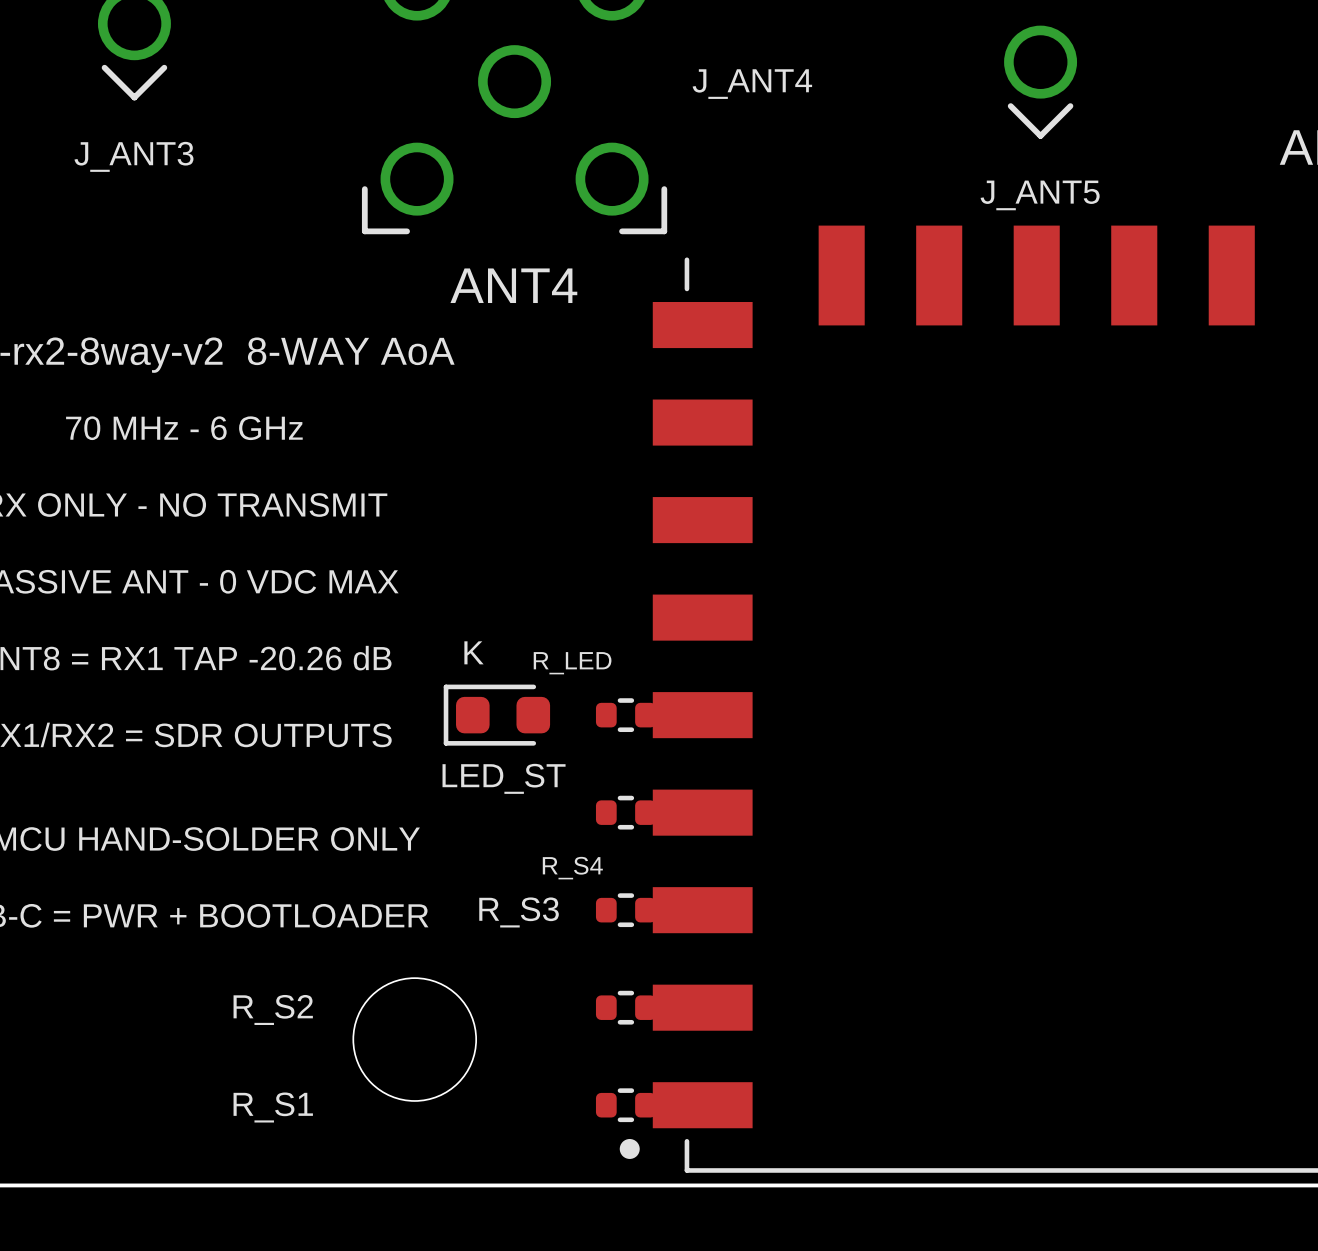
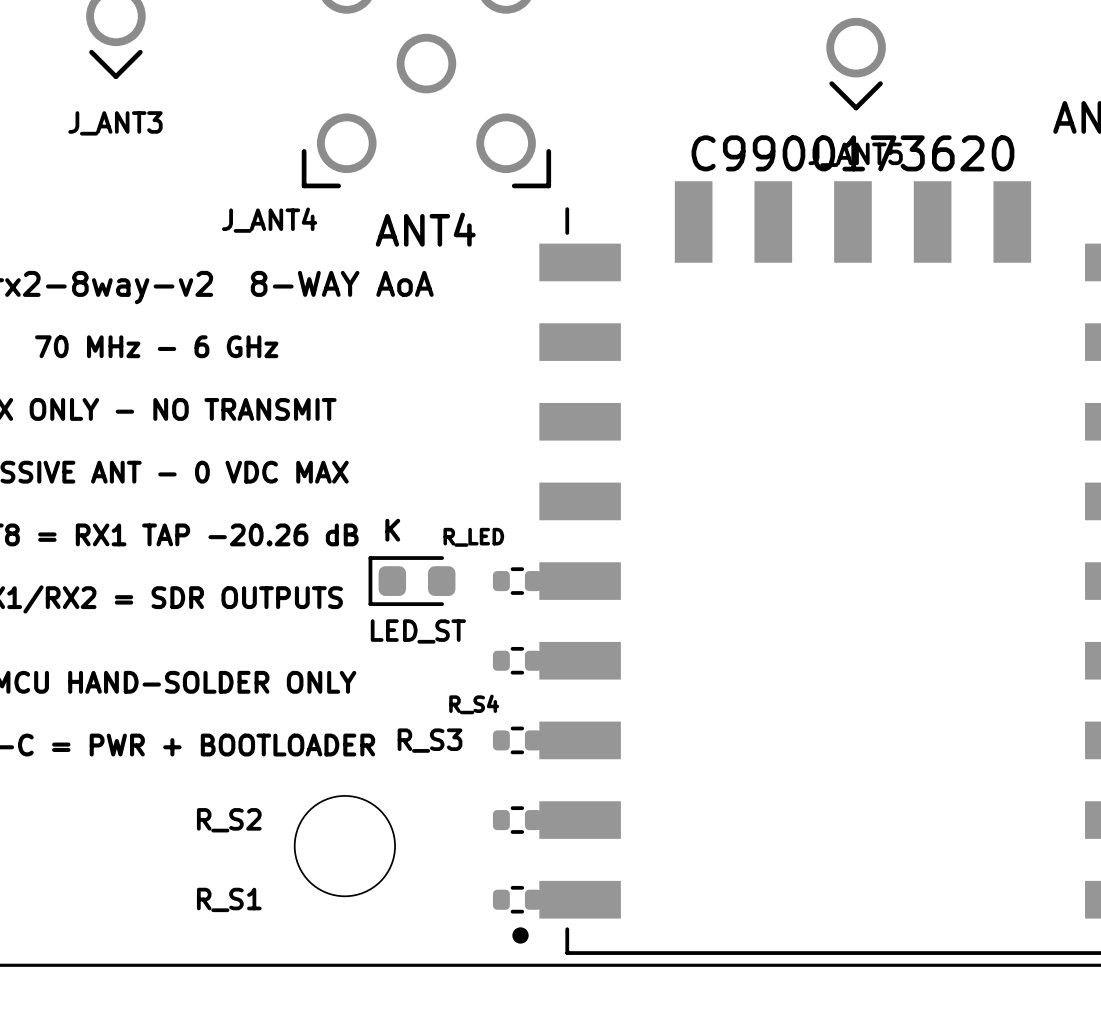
J_ANT4 name position: J_ANT4 (752, 84) -> J_ANT4 (269, 220)
part value: none -> C9900173620 (852, 153)

